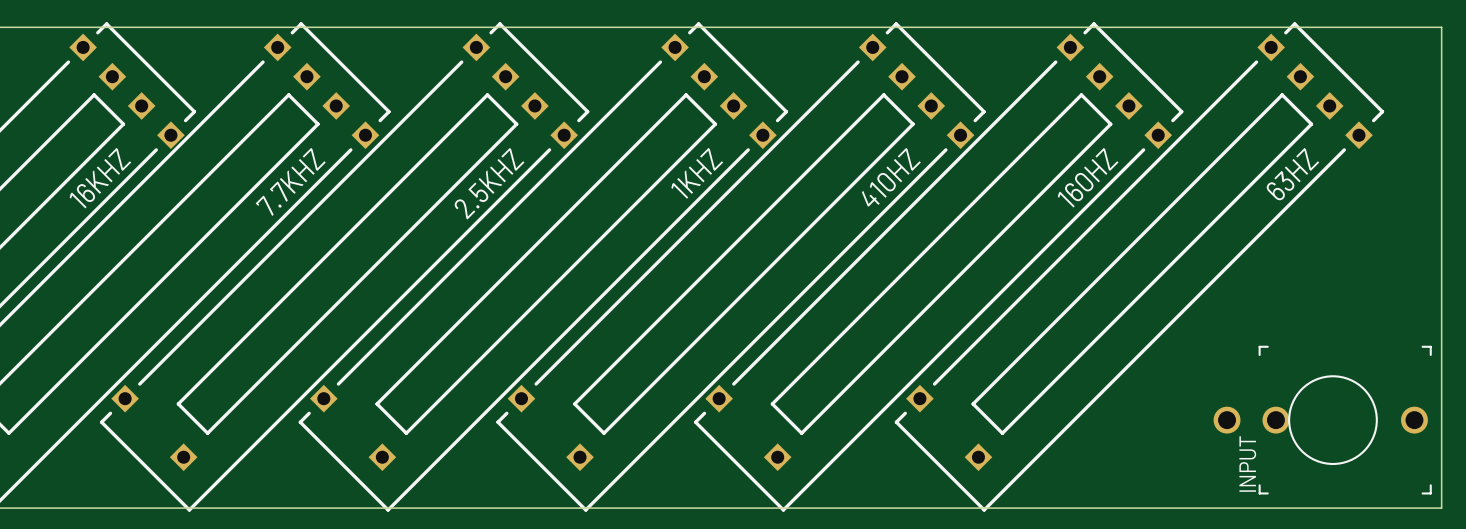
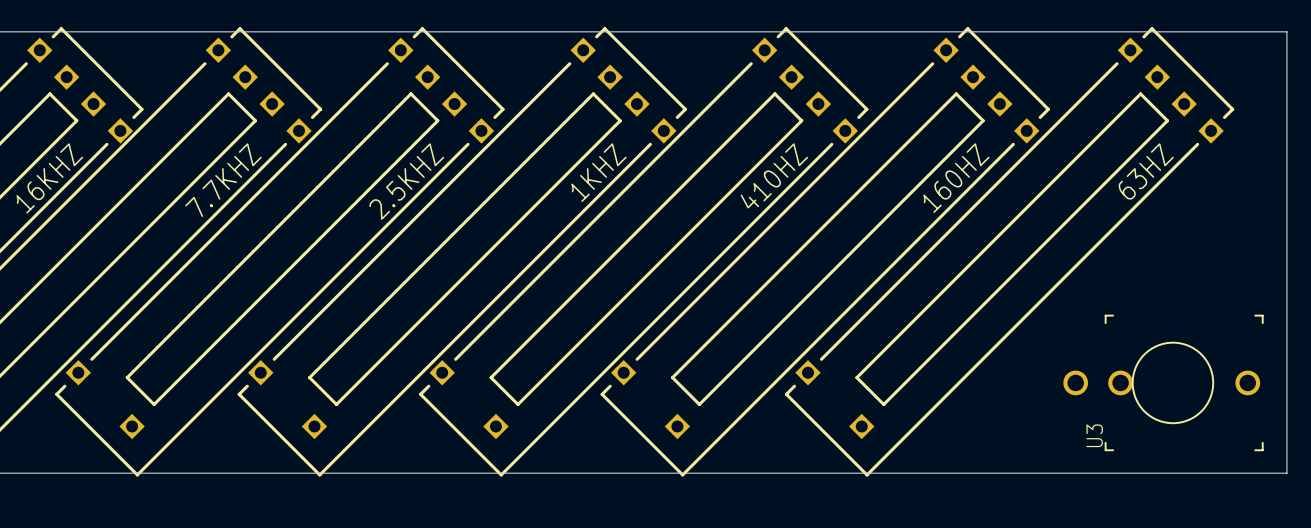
U3: none -> (1163, 382)
INPUT: (1322, 420) -> none

